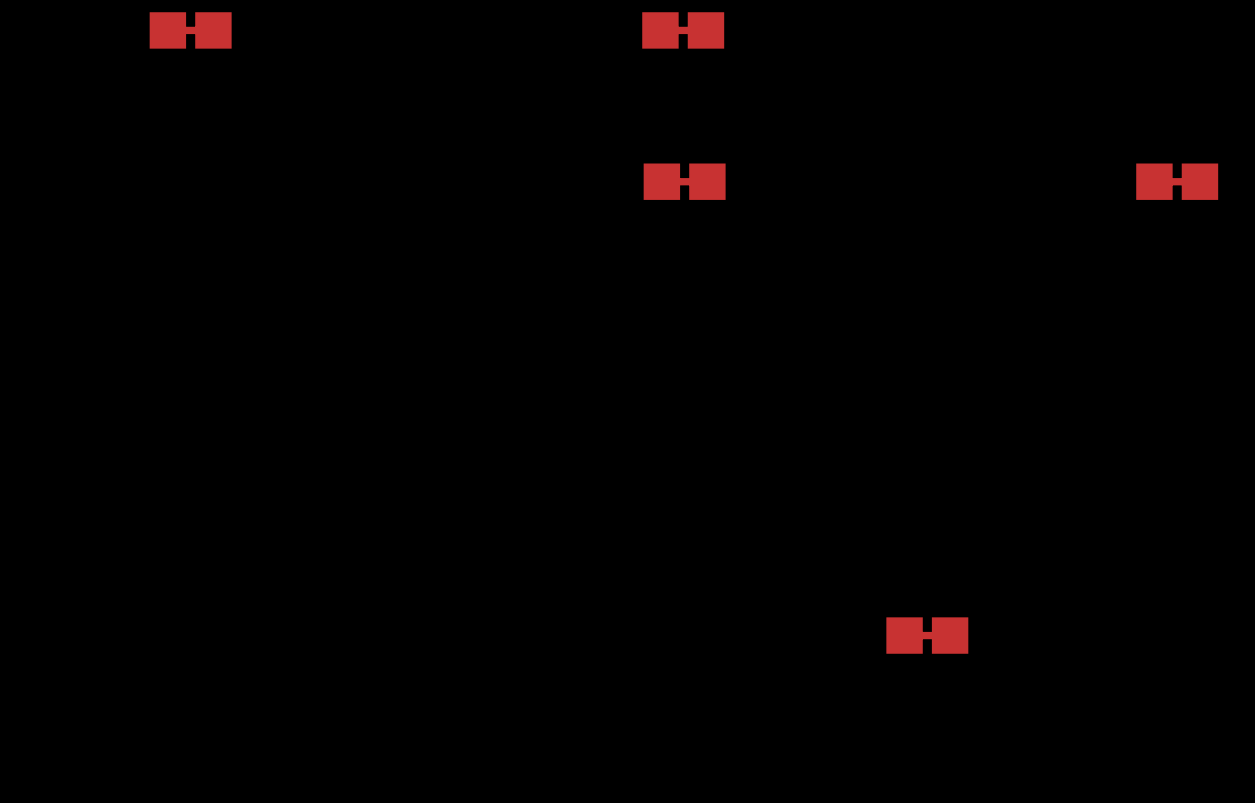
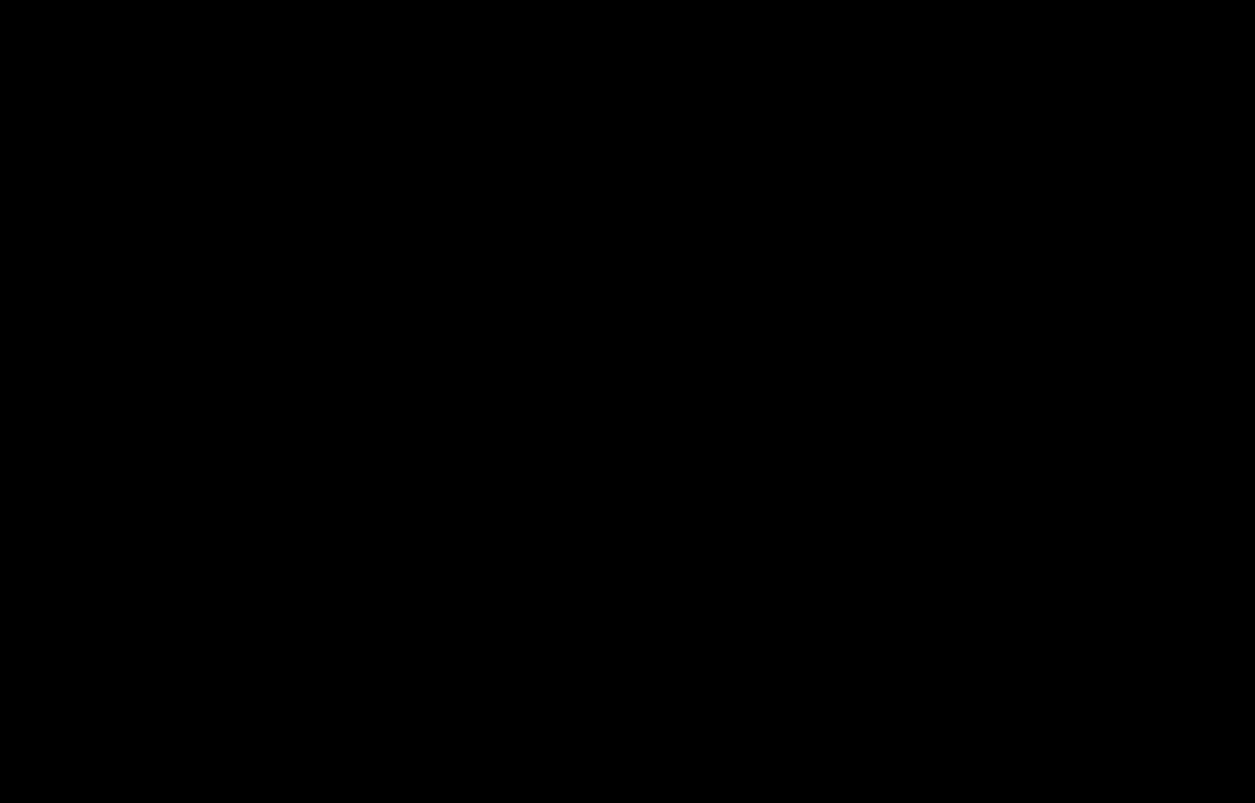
part: (190, 30) -> none
part: (683, 30) -> none
part: (684, 181) -> none
part: (1177, 181) -> none
part: (927, 635) -> none

